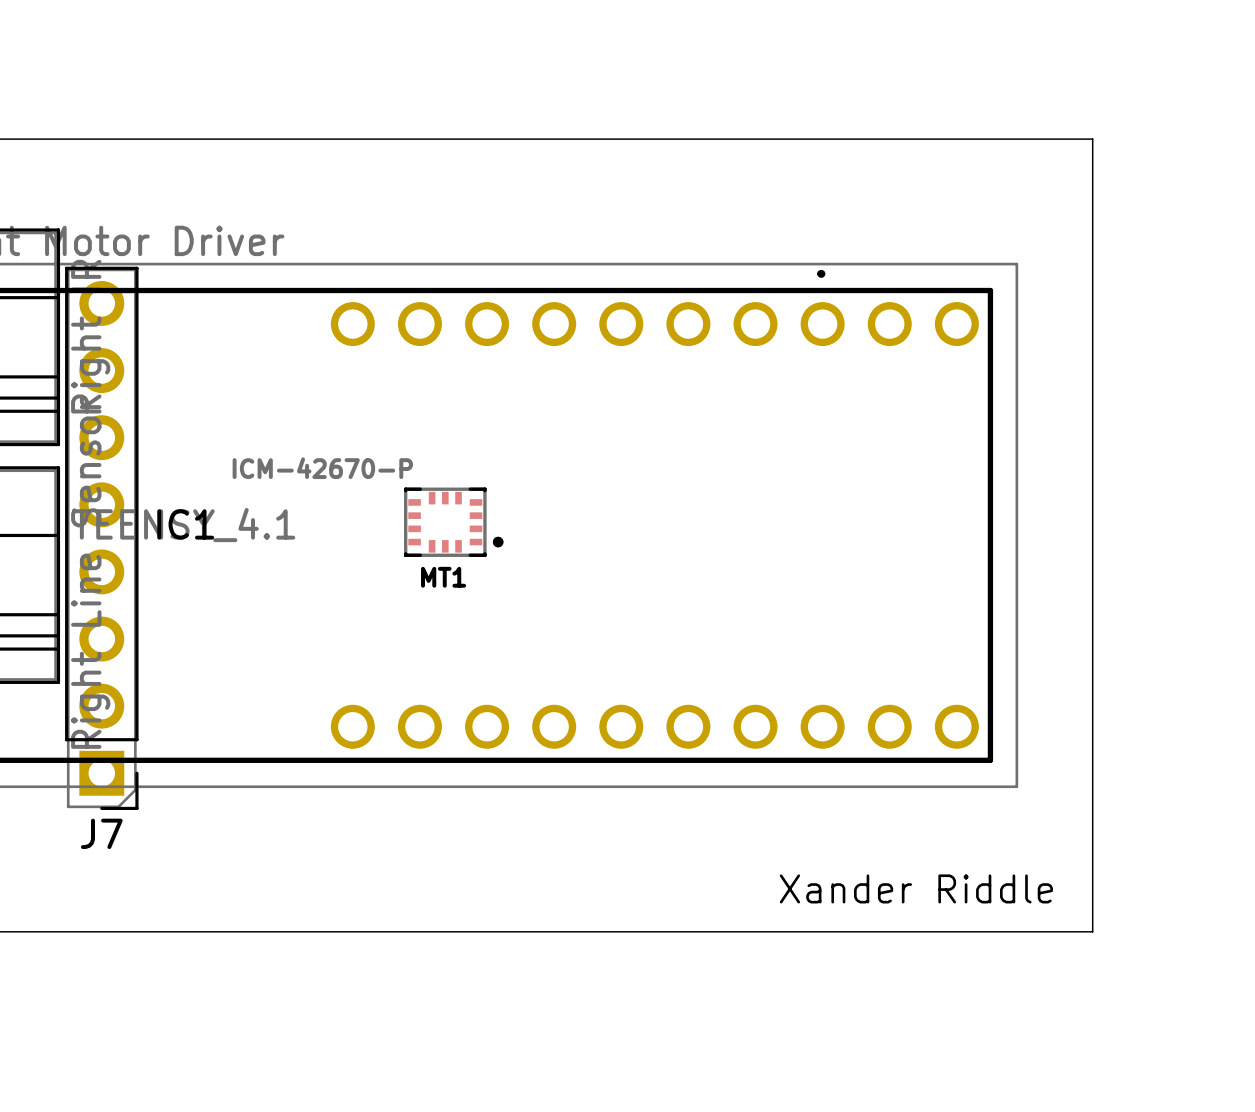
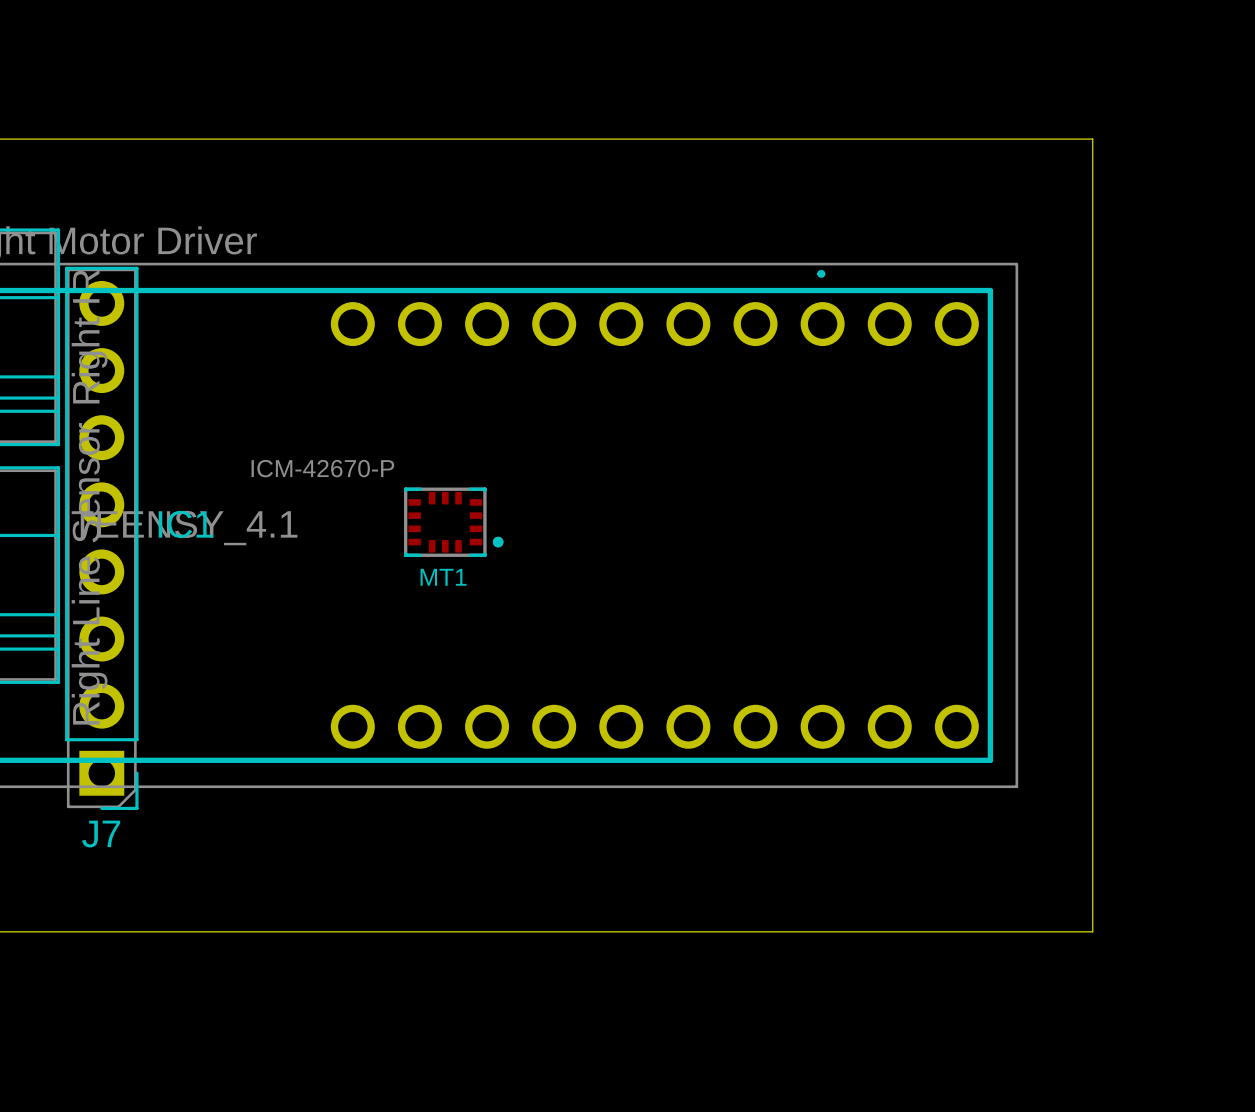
text: Xander Riddle (916, 888) -> none

